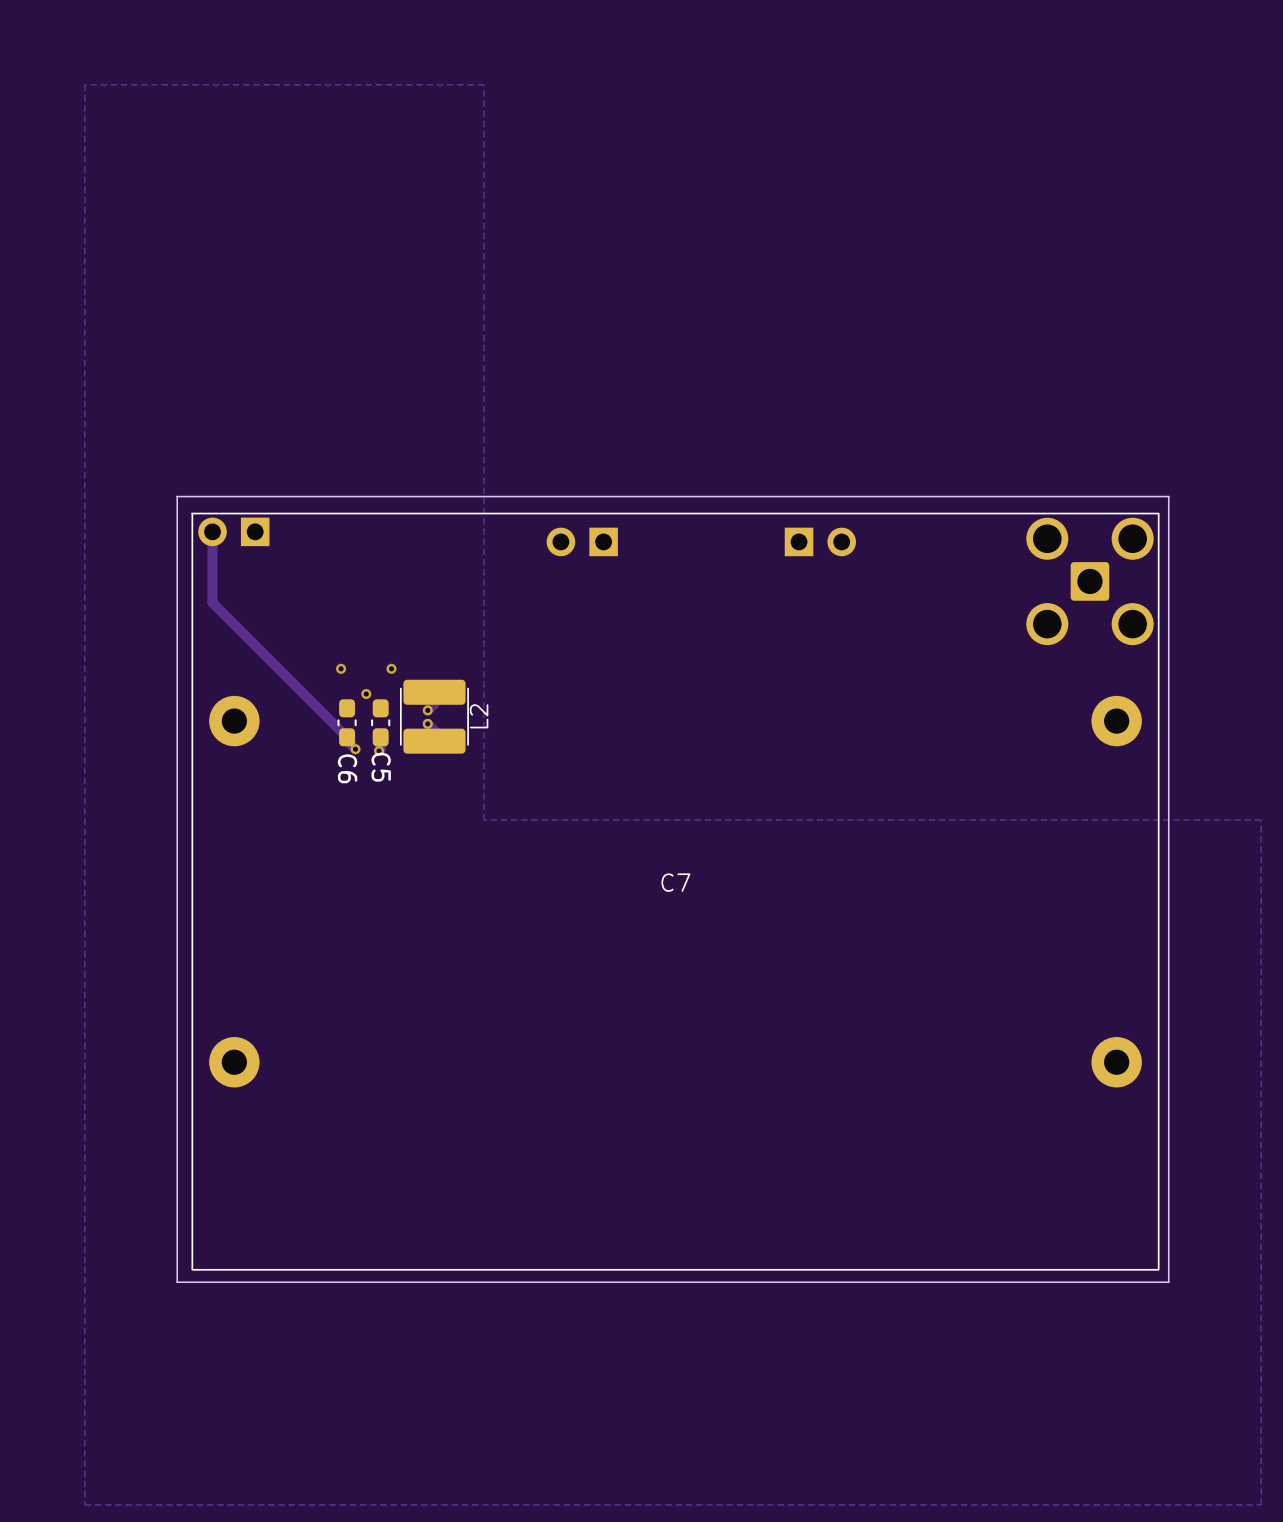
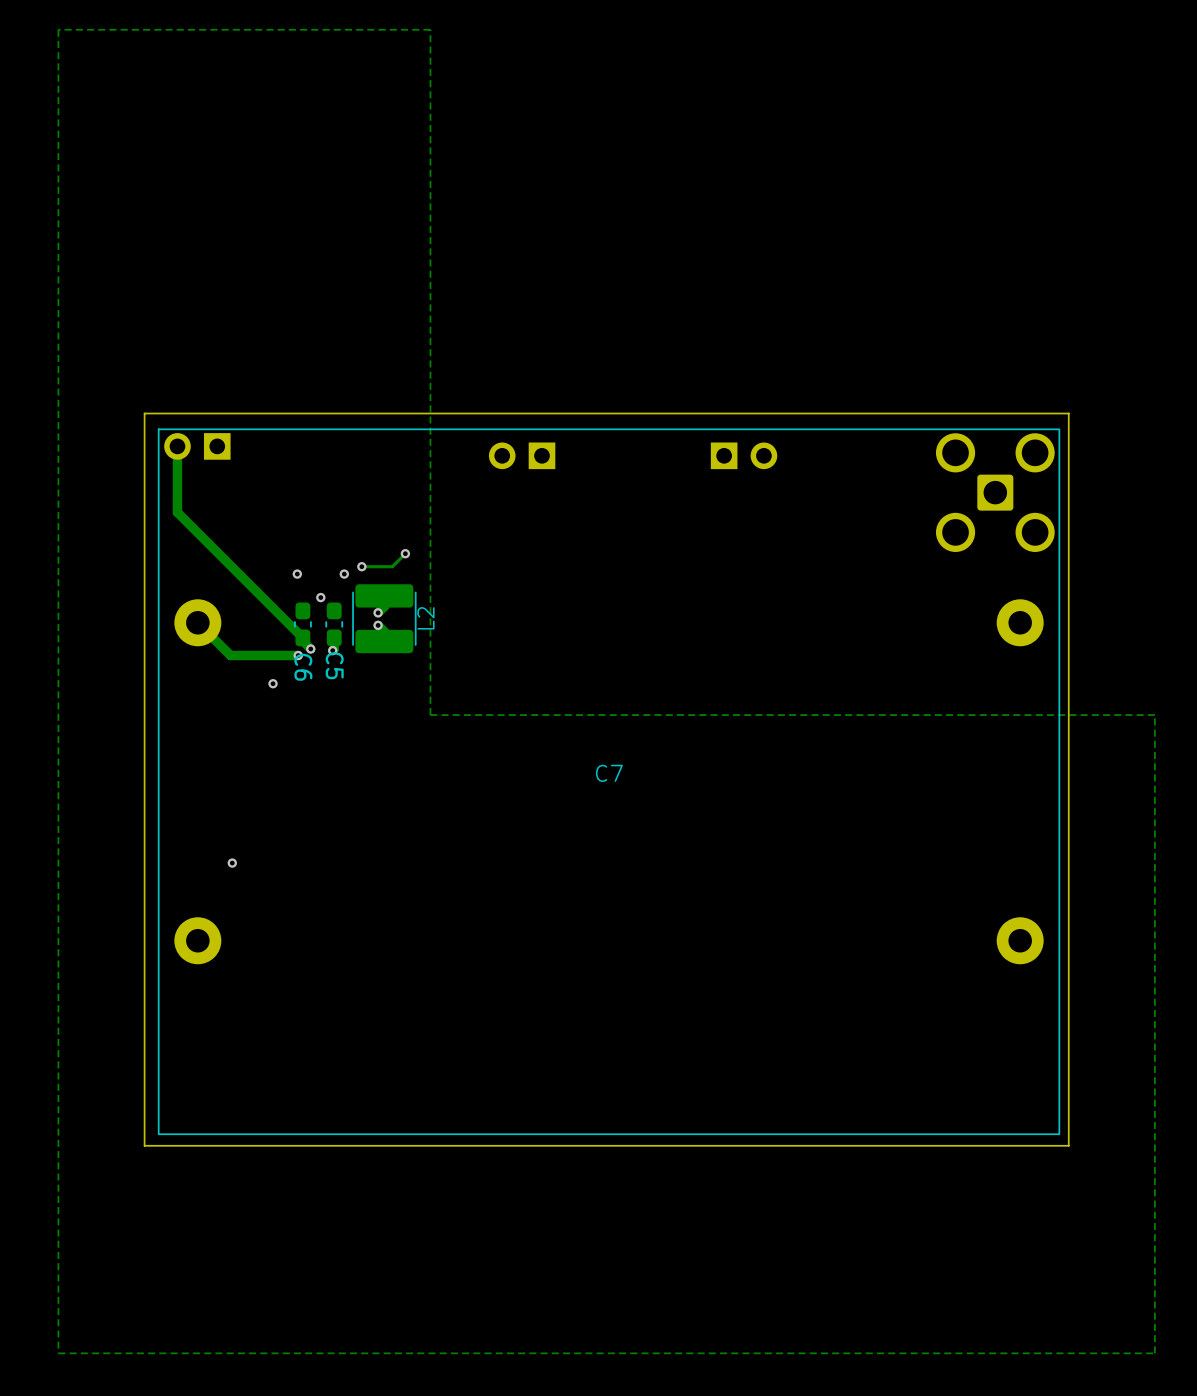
track: none -> (405, 553) (392, 566) (361, 566)
via: none -> (405, 553)
via: none -> (361, 566)
track: none -> (197, 622) (230, 655) (298, 655)
via: none -> (298, 655)
via: none -> (273, 683)
via: none -> (232, 863)

